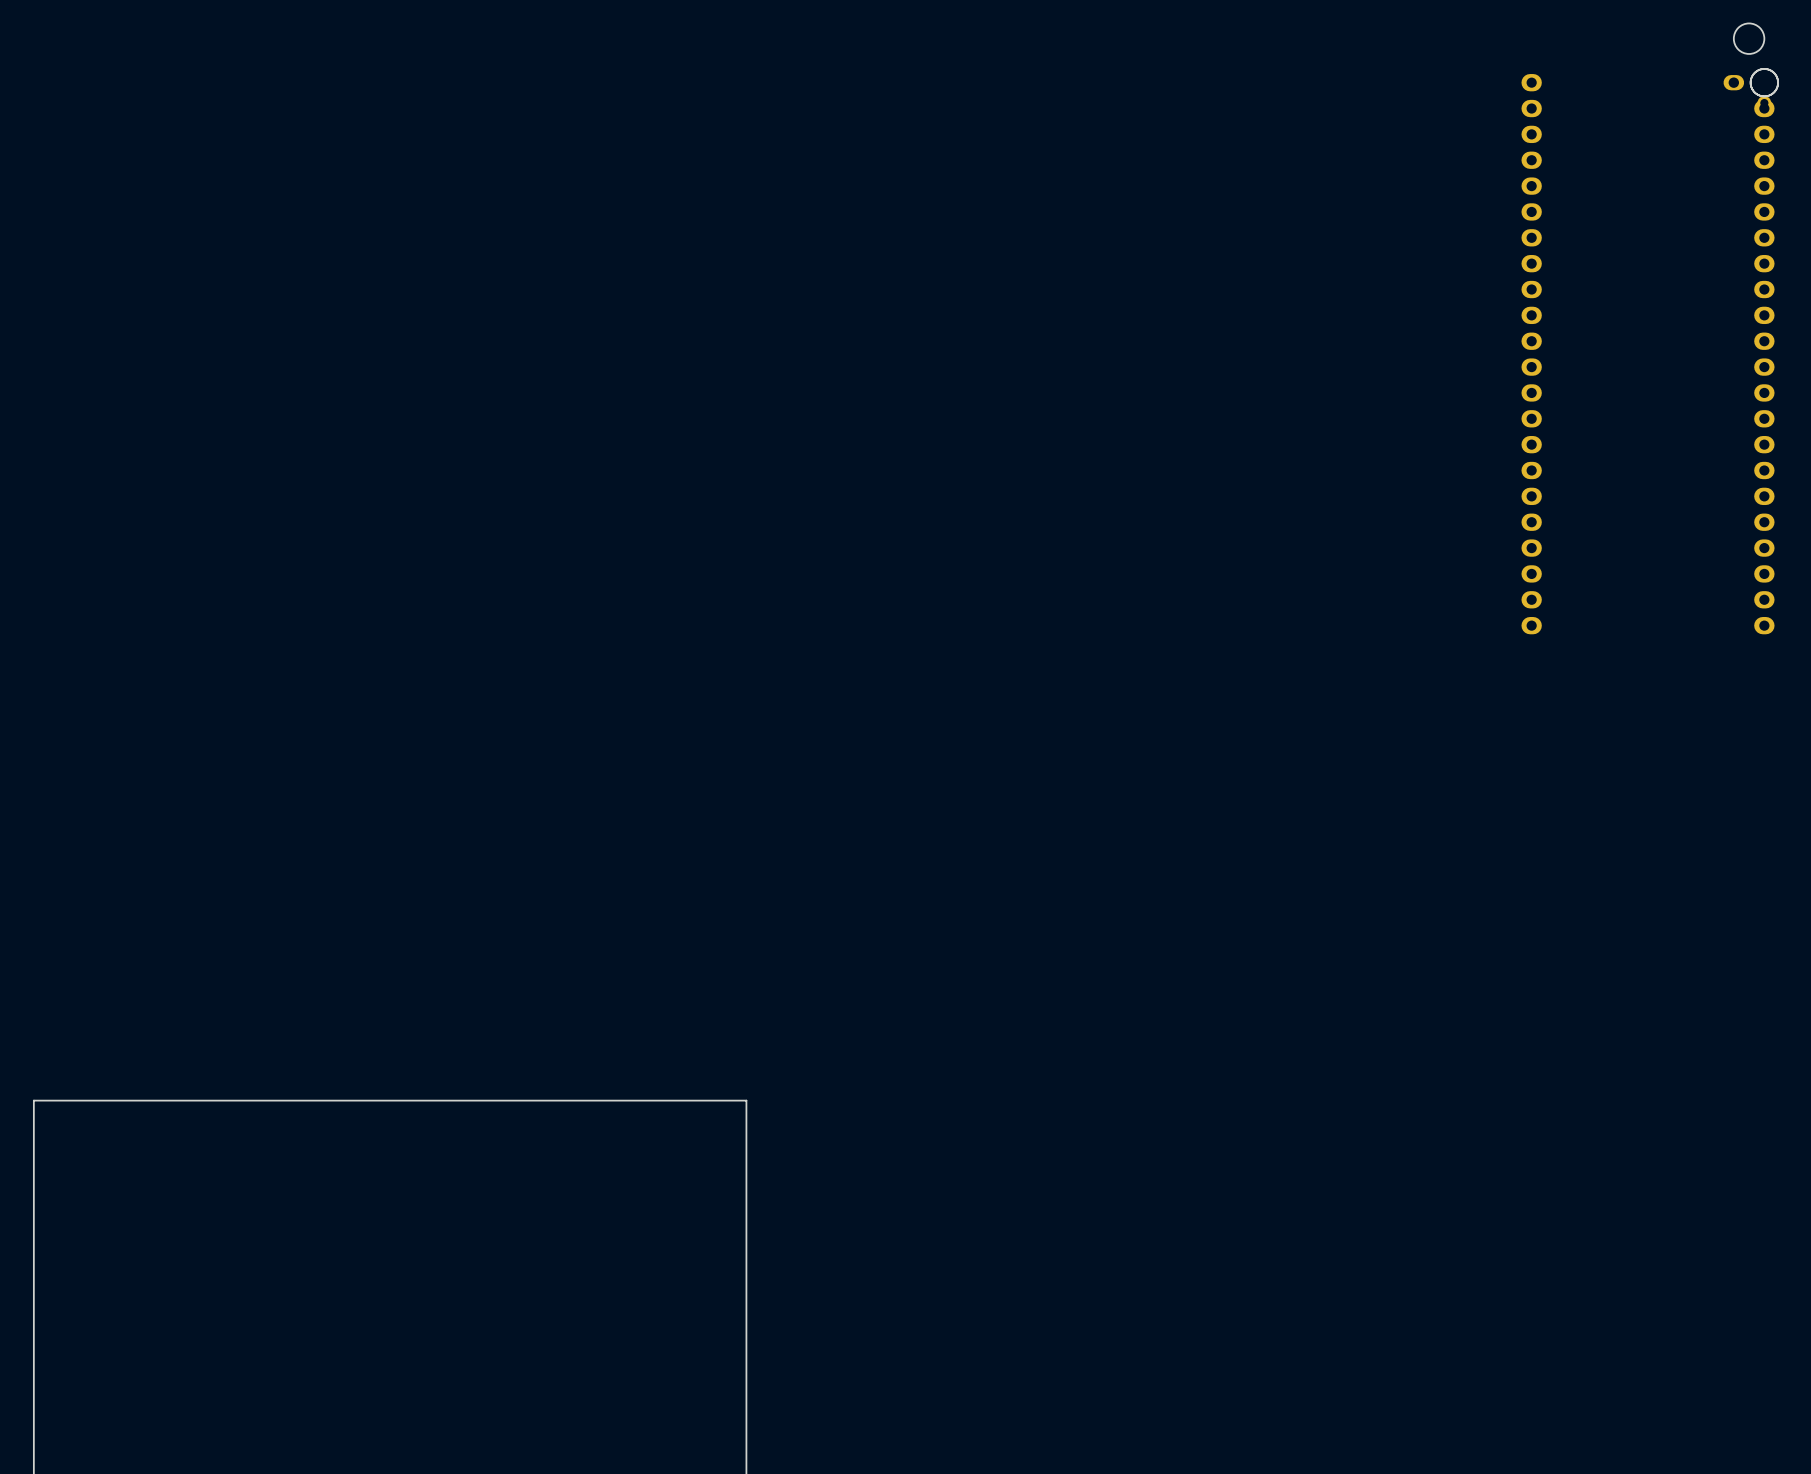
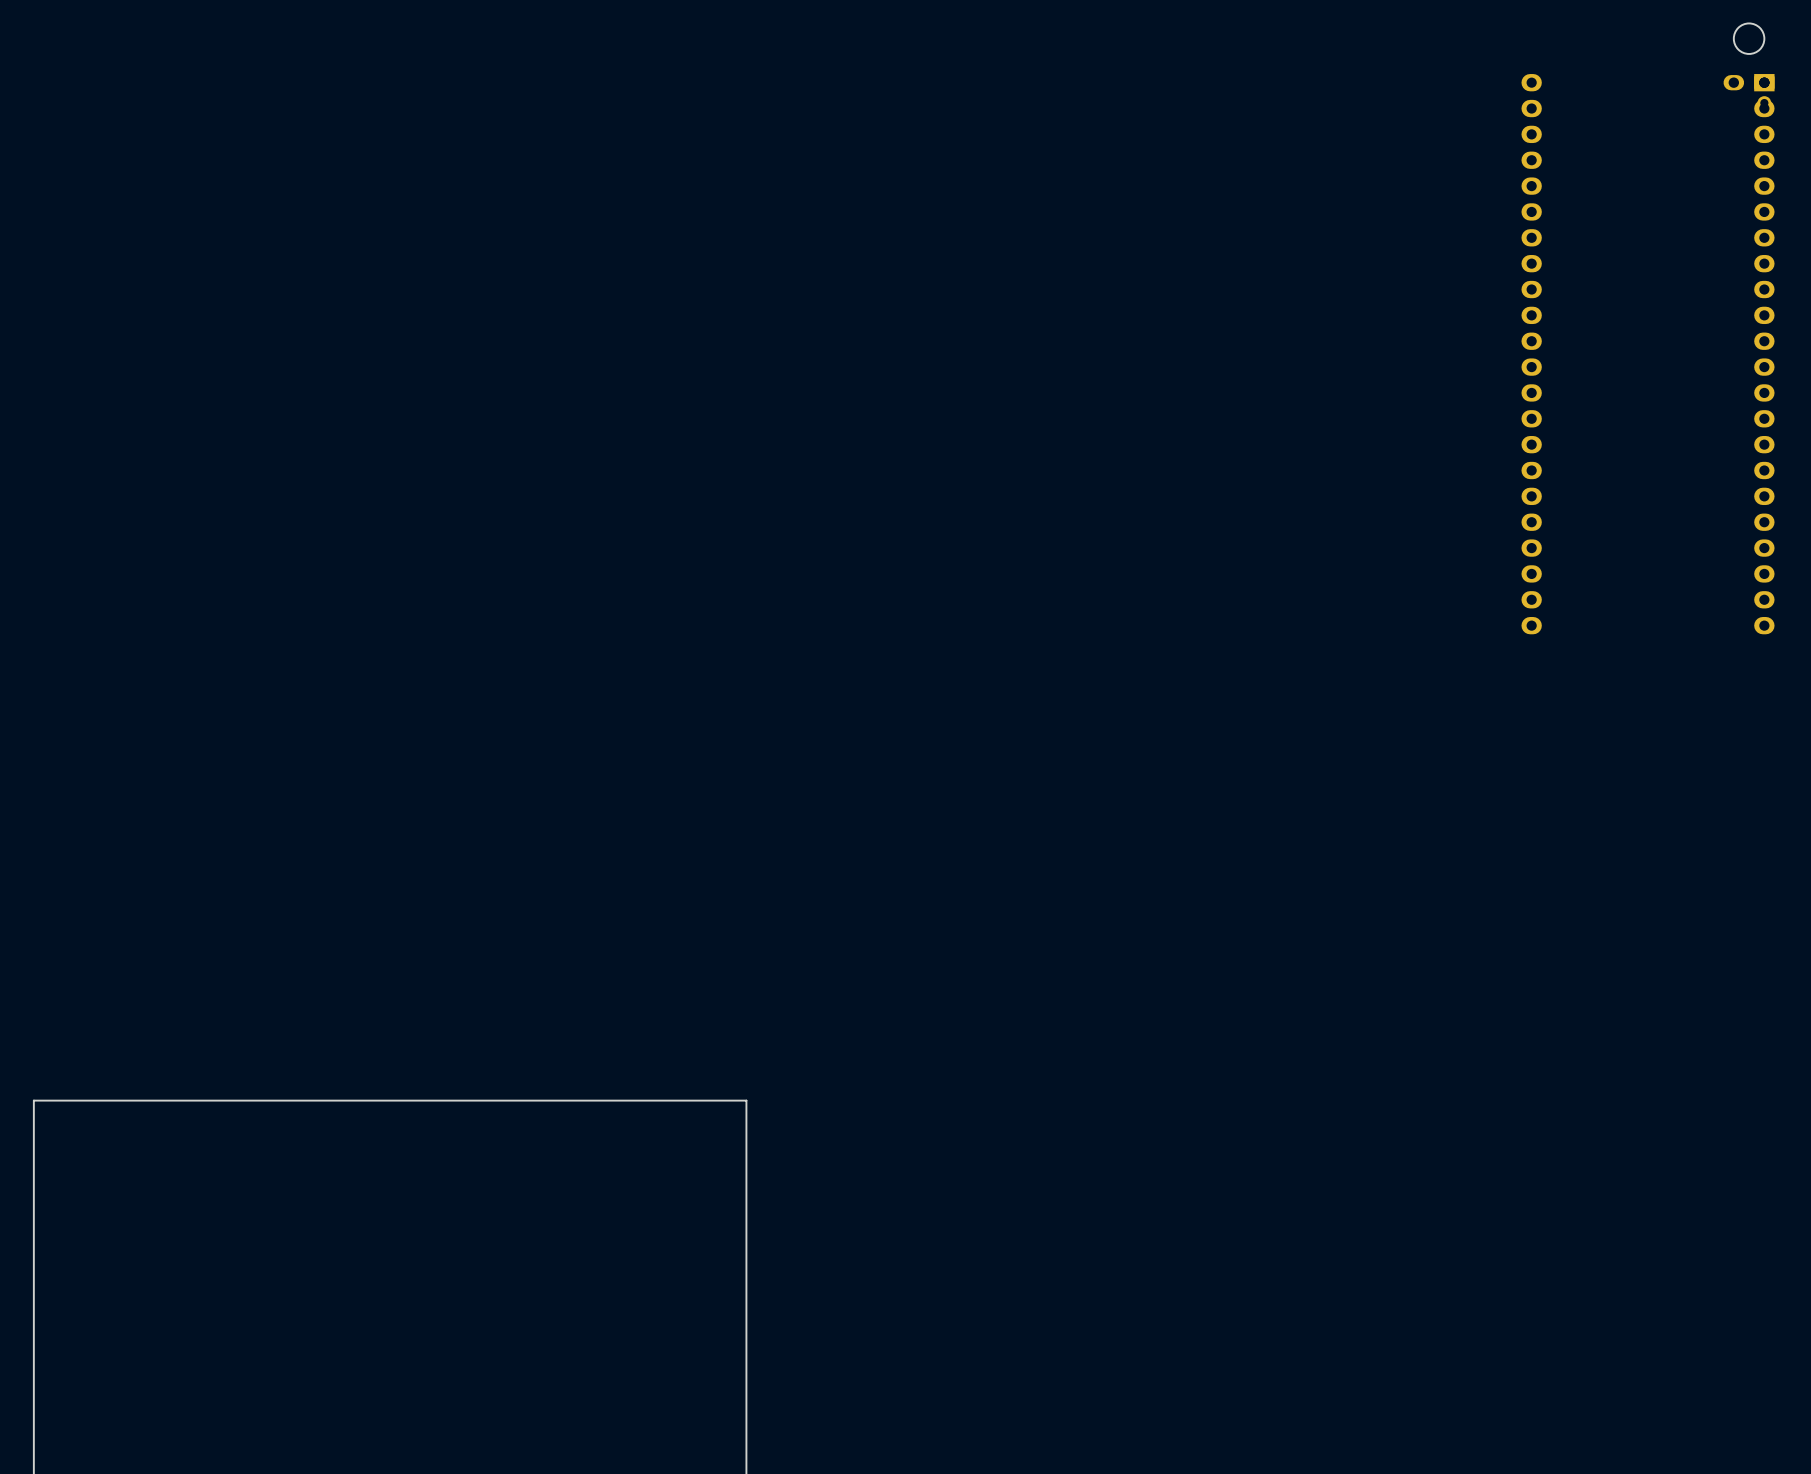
part: (1764, 82) -> none

